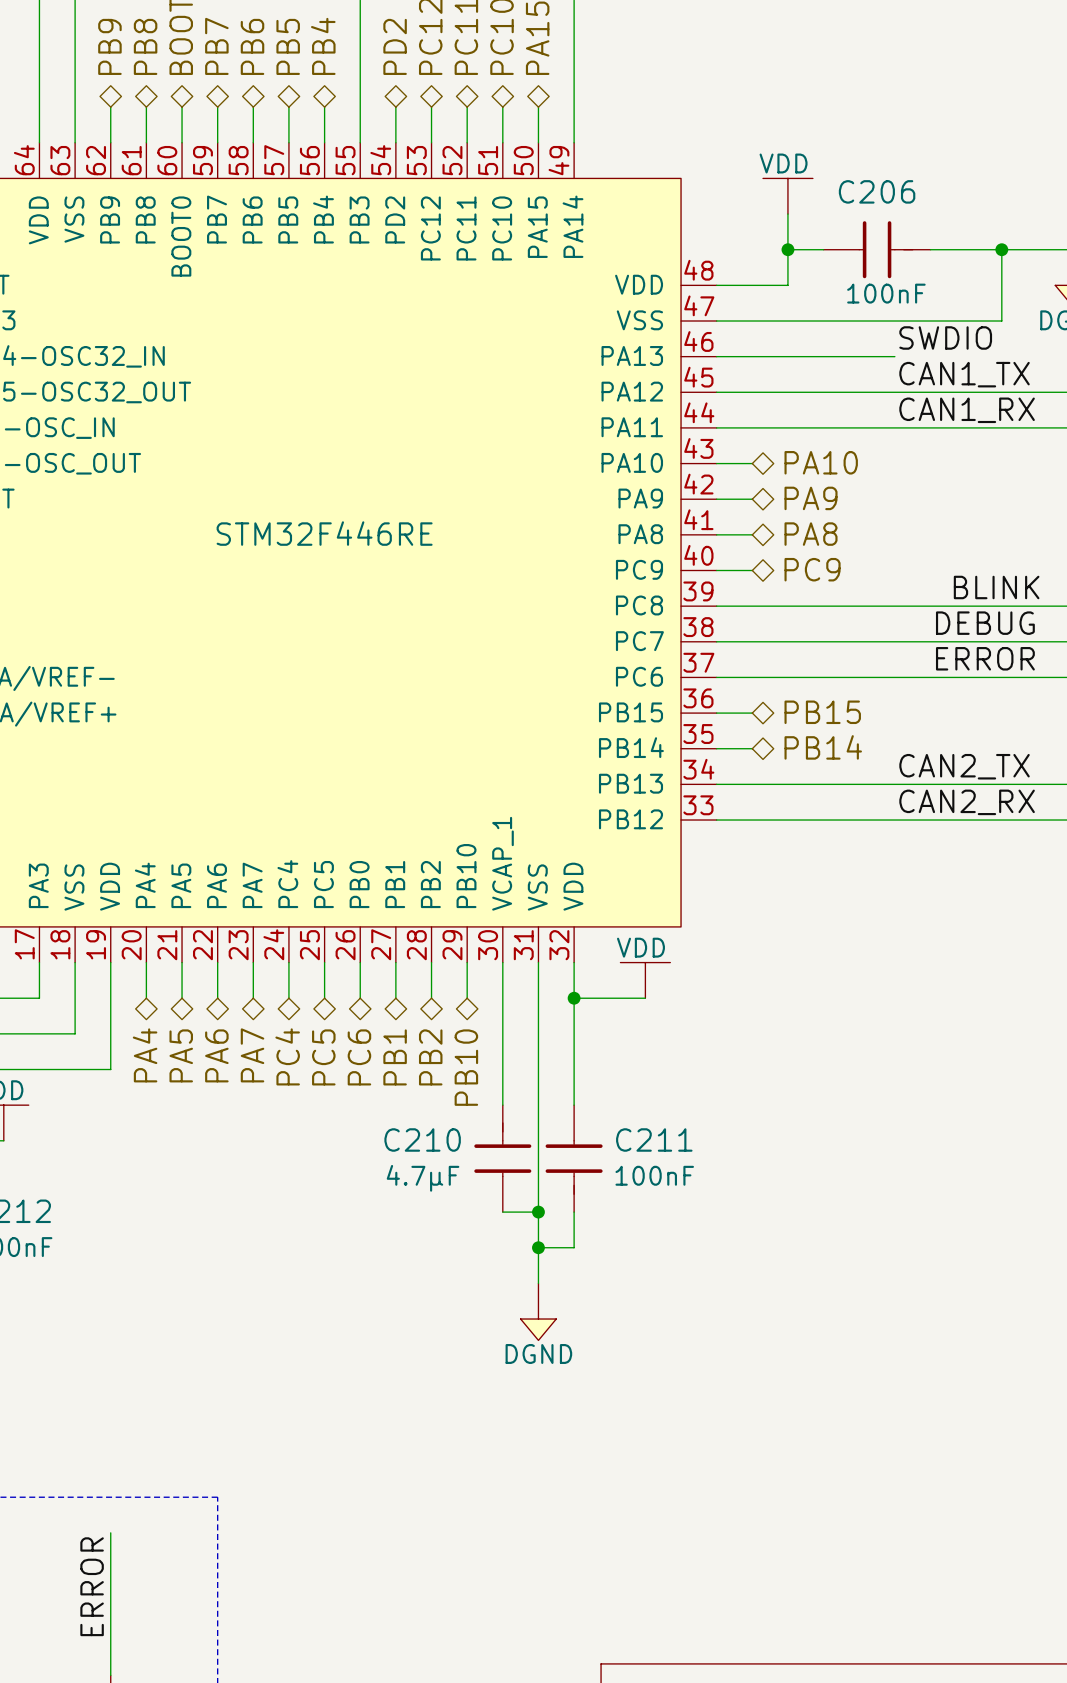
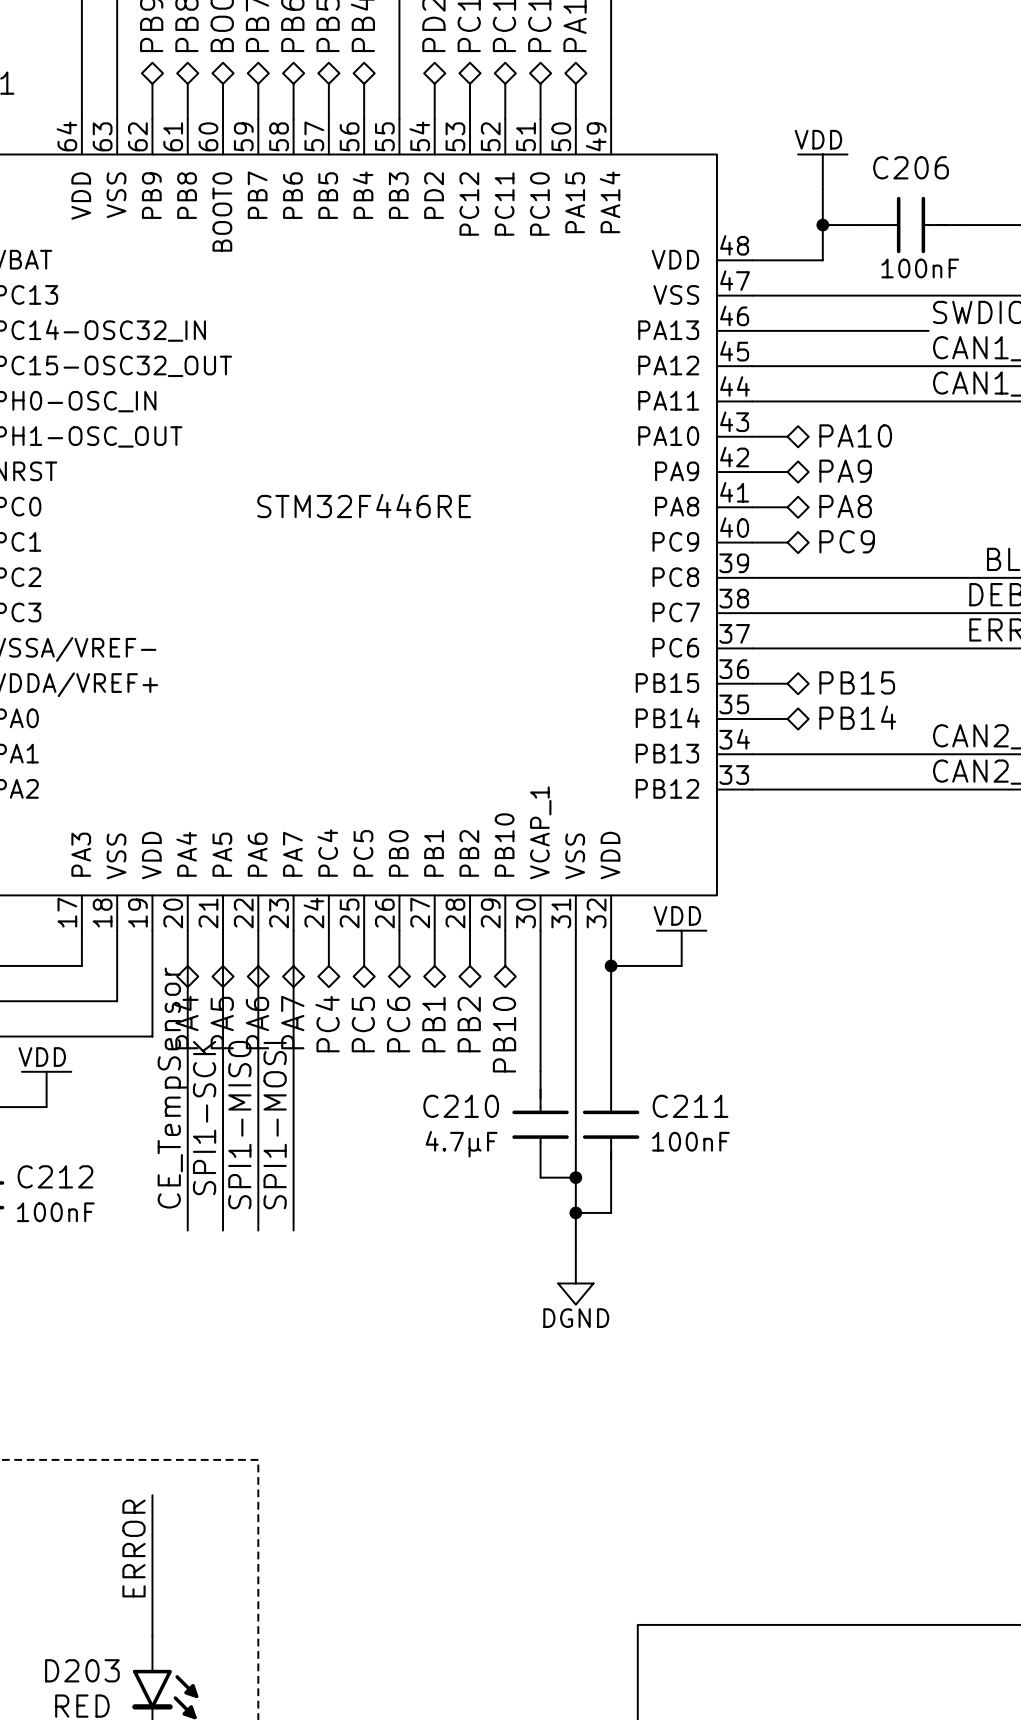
wire: none -> (187, 965) (187, 1230)
wire: none -> (223, 965) (223, 1230)
wire: none -> (258, 965) (258, 1230)
wire: none -> (293, 965) (293, 1230)
label: none -> CE_TempSensor (172, 1088)
label: none -> SPI1-SCK (204, 1118)
label: none -> SPI1-MISO (239, 1125)
label: none -> SPI1-MOSI (275, 1125)

